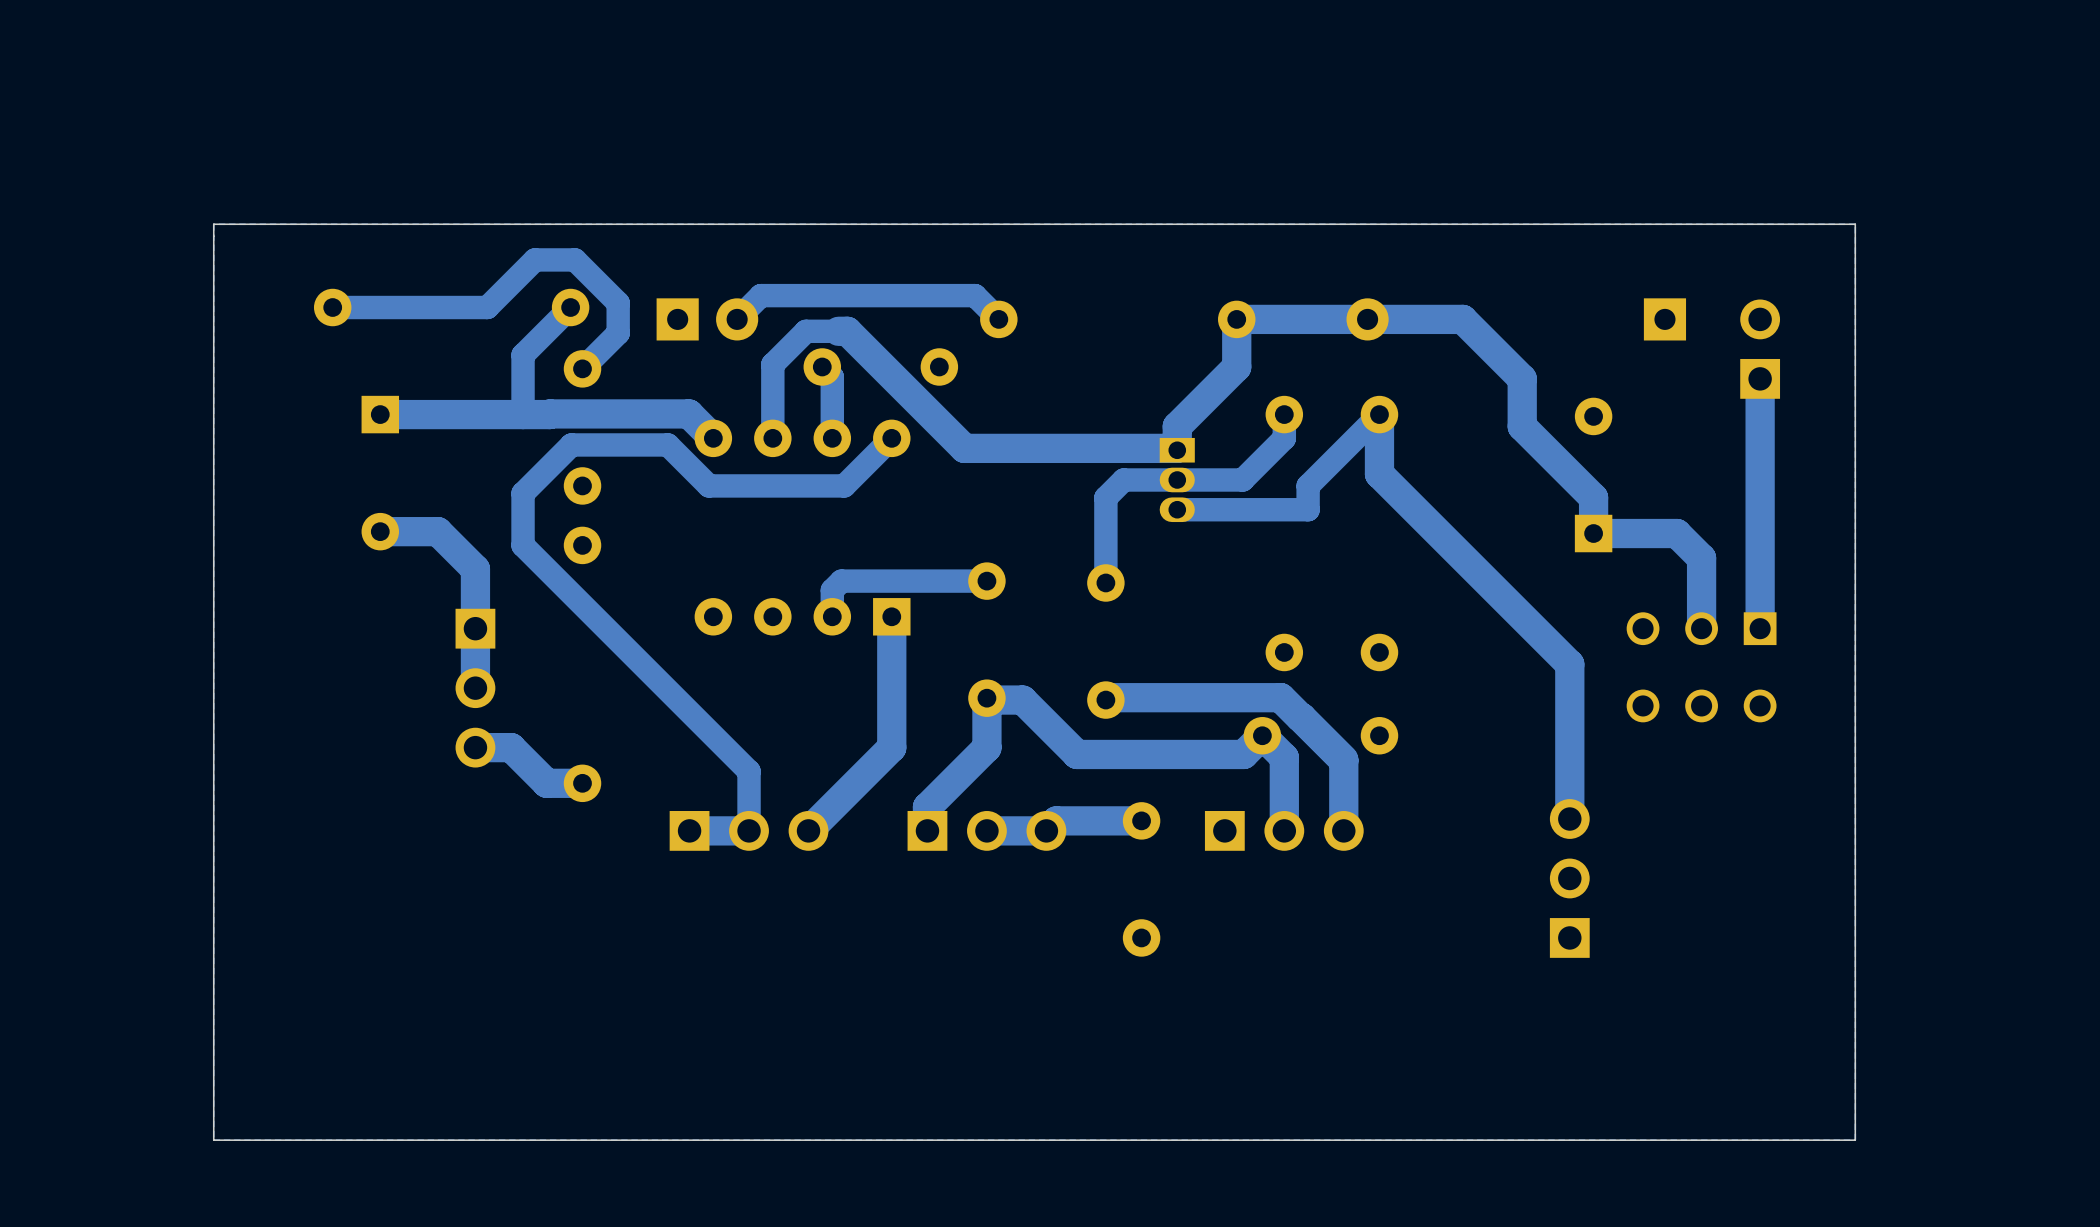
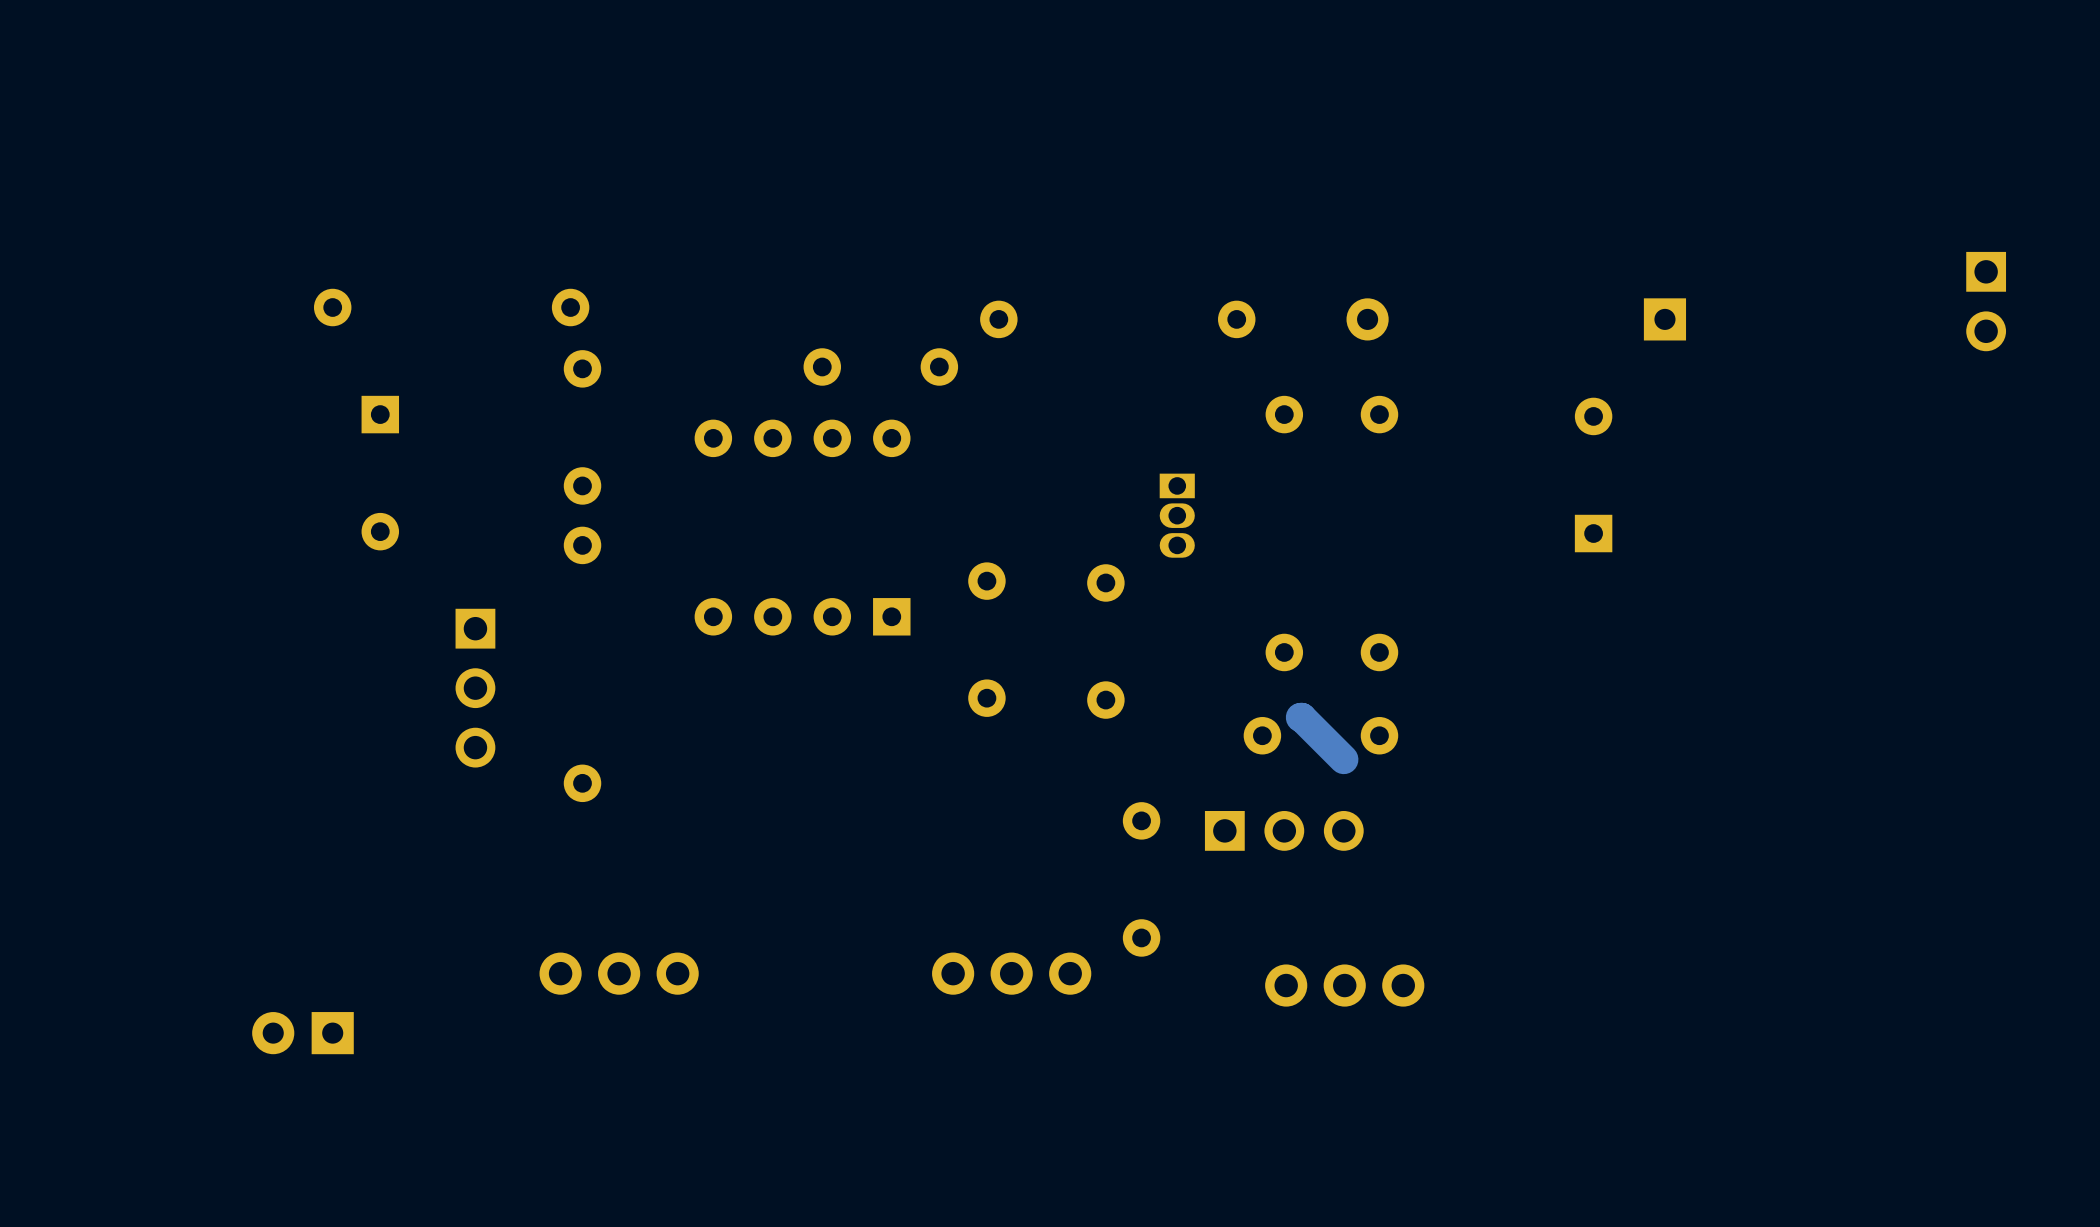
board edge: (1855, 224) (213, 224) (213, 1140) (1855, 1140) (1855, 224) -> none
bottom track: (332, 307) (487, 307) (534, 259) (575, 259) (618, 303) (618, 333) (582, 368) -> none
bottom track: (570, 307) (523, 355) (523, 414) -> none
part: (707, 319) -> none
bottom track: (998, 319) (975, 295) (760, 295) (737, 319) -> none
part rotation: 0° (1760, 349) -> 180° (1986, 301)
part position: (1760, 349) -> (1986, 301)
bottom track: (822, 366) (832, 377) (832, 438) -> none
bottom track: (1760, 378) (1760, 628) -> none
bottom track: (380, 414) (688, 413) (713, 438) -> none
bottom track: (1284, 414) (1284, 438) (1242, 479) (1123, 479) (1105, 497) (1105, 582) -> none
bottom track: (772, 438) (772, 364) (805, 331) (847, 331) (964, 448) (1177, 448) (1177, 426) (1236, 366) (1236, 319) (1462, 319) (1522, 378) (1522, 426) (1593, 497) (1593, 533) -> none
bottom track: (891, 438) (844, 485) (708, 485) (667, 444) (571, 444) (523, 493) (523, 545) (749, 771) (749, 830) (689, 830) -> none
part position: (1177, 479) -> (1177, 515)
bottom track: (1177, 509) (1308, 509) (1308, 485) (1379, 414) (1379, 474) (1569, 664) (1569, 819) -> none
bottom track: (380, 531) (437, 531) (475, 569) (475, 688) -> none
bottom track: (1605, 533) (1676, 533) (1701, 558) (1701, 628) -> none
bottom track: (986, 581) (841, 581) (832, 590) (832, 616) -> none
bottom track: (891, 616) (891, 747) (808, 830) -> none
part: (1701, 667) -> none
bottom track: (1105, 700) (1108, 697) (1280, 697) (1343, 760) (1343, 830) -> none
bottom track: (475, 747) (511, 747) (546, 783) (582, 783) -> none
bottom track: (1141, 820) (1056, 820) (1046, 830) (986, 830) -> none
part: (749, 830) -> none
part: (986, 830) -> none
bottom track: (1284, 830) (1284, 757) (1262, 735) (1243, 754) (1077, 754) (1022, 700) (988, 700) (986, 698) (986, 747) (927, 807) (927, 830) -> none
part: (1569, 878) -> none
part: none -> (619, 973)
part: none -> (1011, 973)
part: none -> (1344, 985)
part: none -> (302, 1033)

